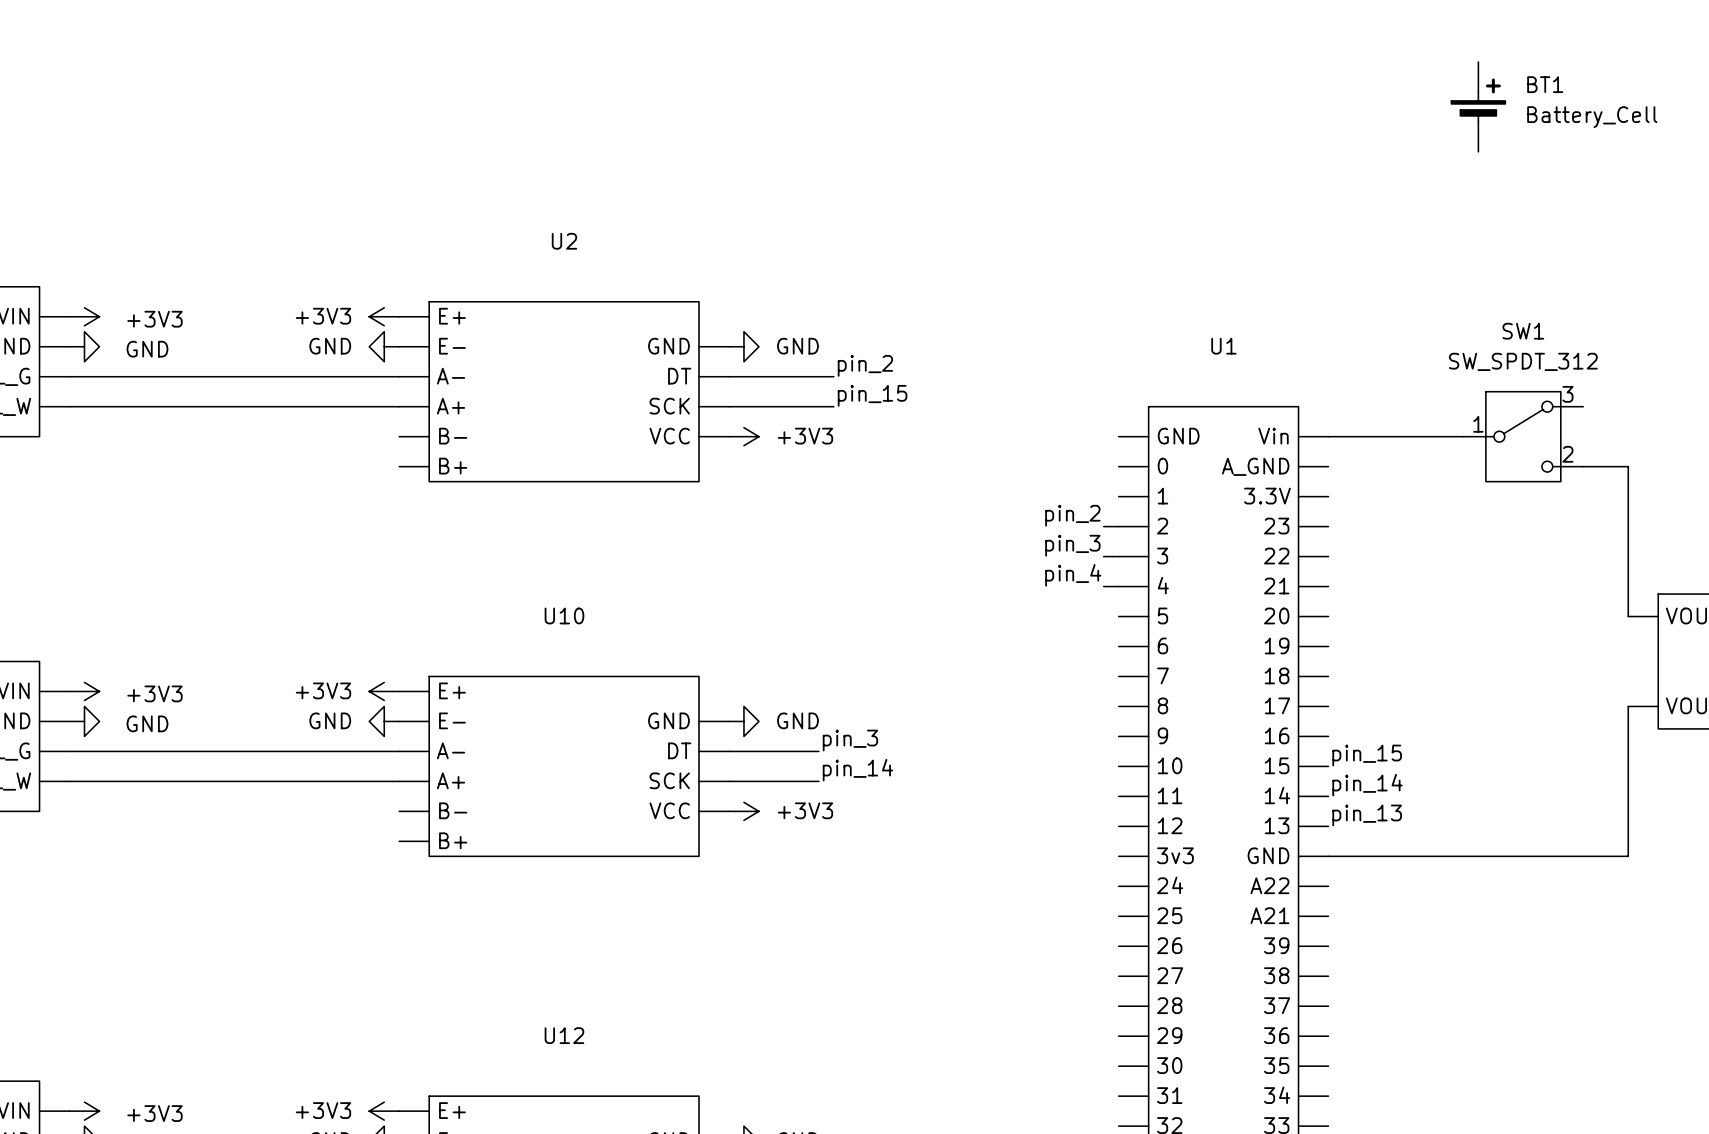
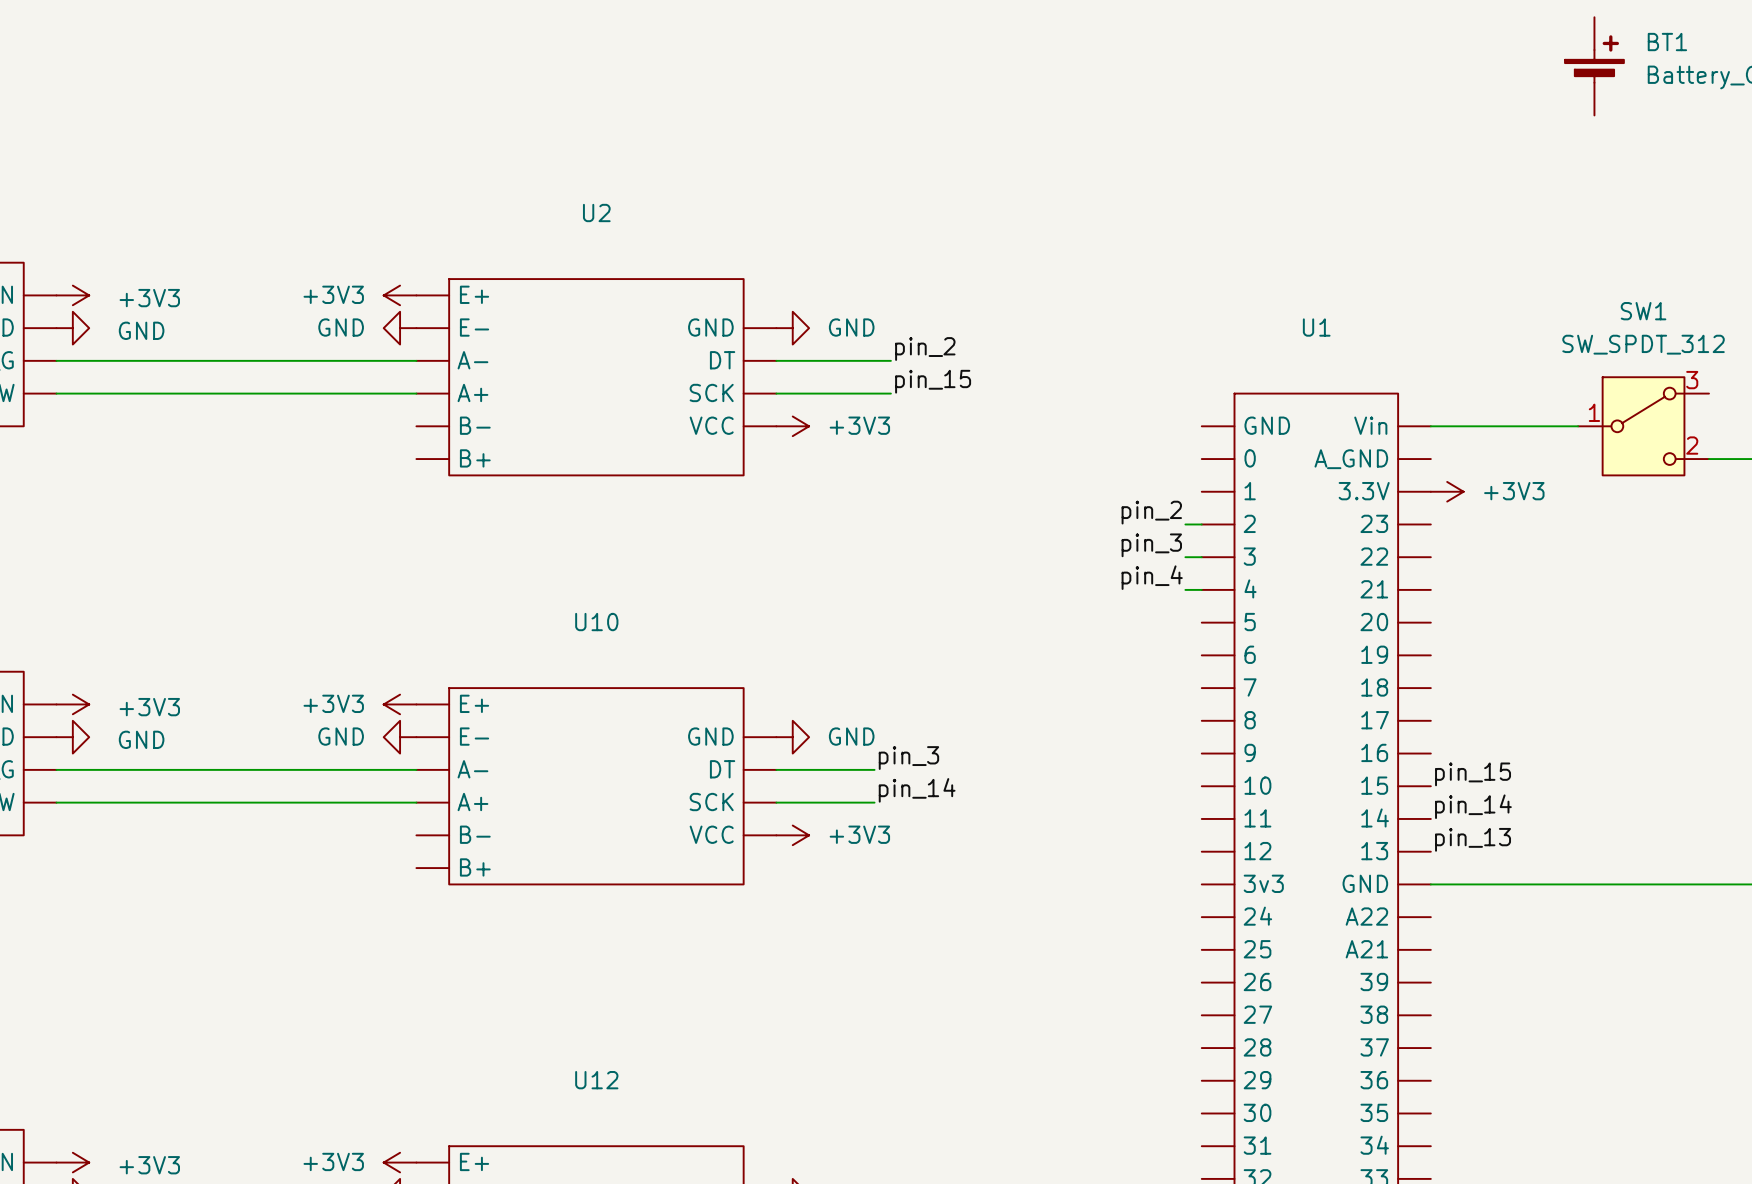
power symbol: none -> +3V3 (1447, 491)

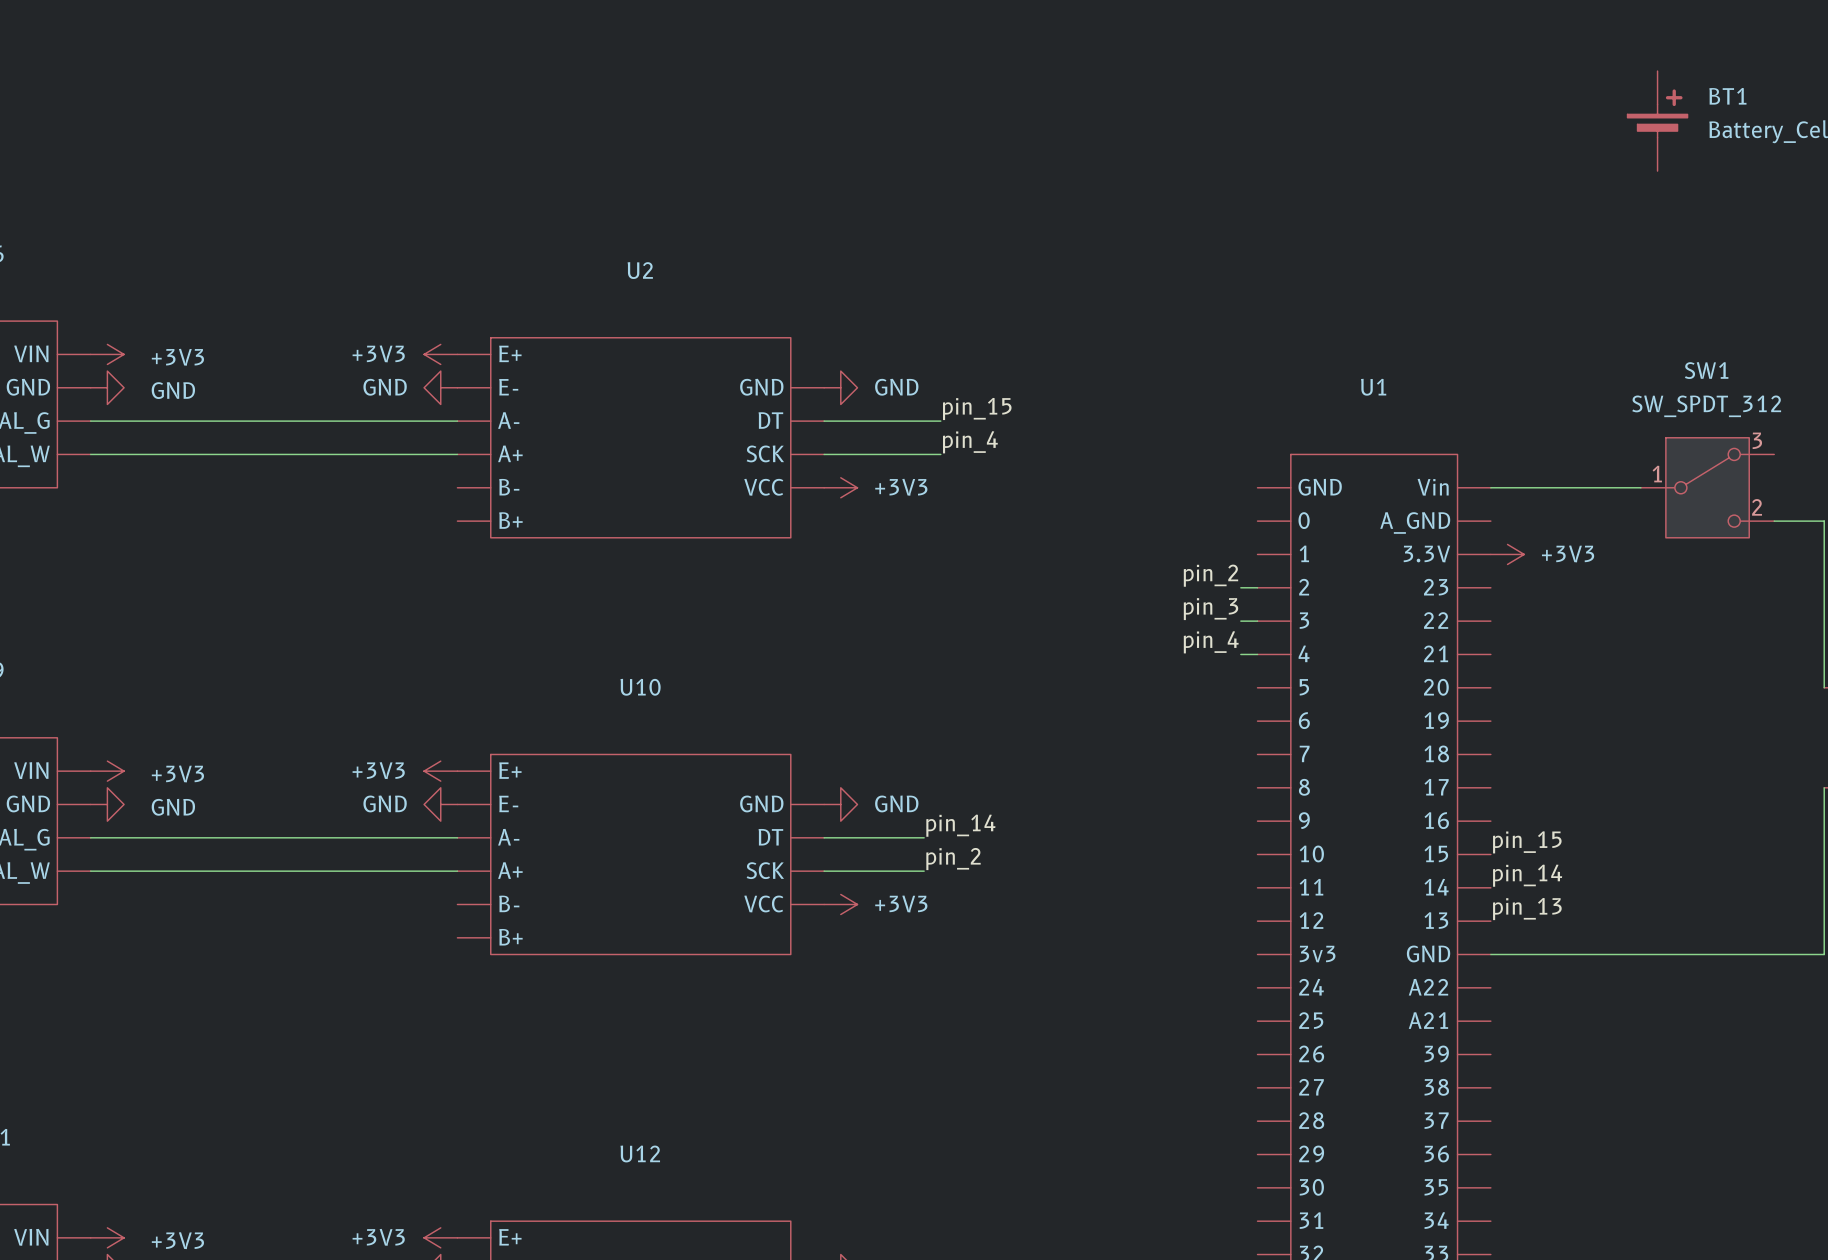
label: pin_2 (925, 348) -> pin_15 (977, 408)
label: pin_15 (933, 381) -> pin_4 (970, 442)
label: pin_3 (908, 758) -> pin_14 (960, 825)
label: pin_14 (917, 790) -> pin_2 (953, 859)

